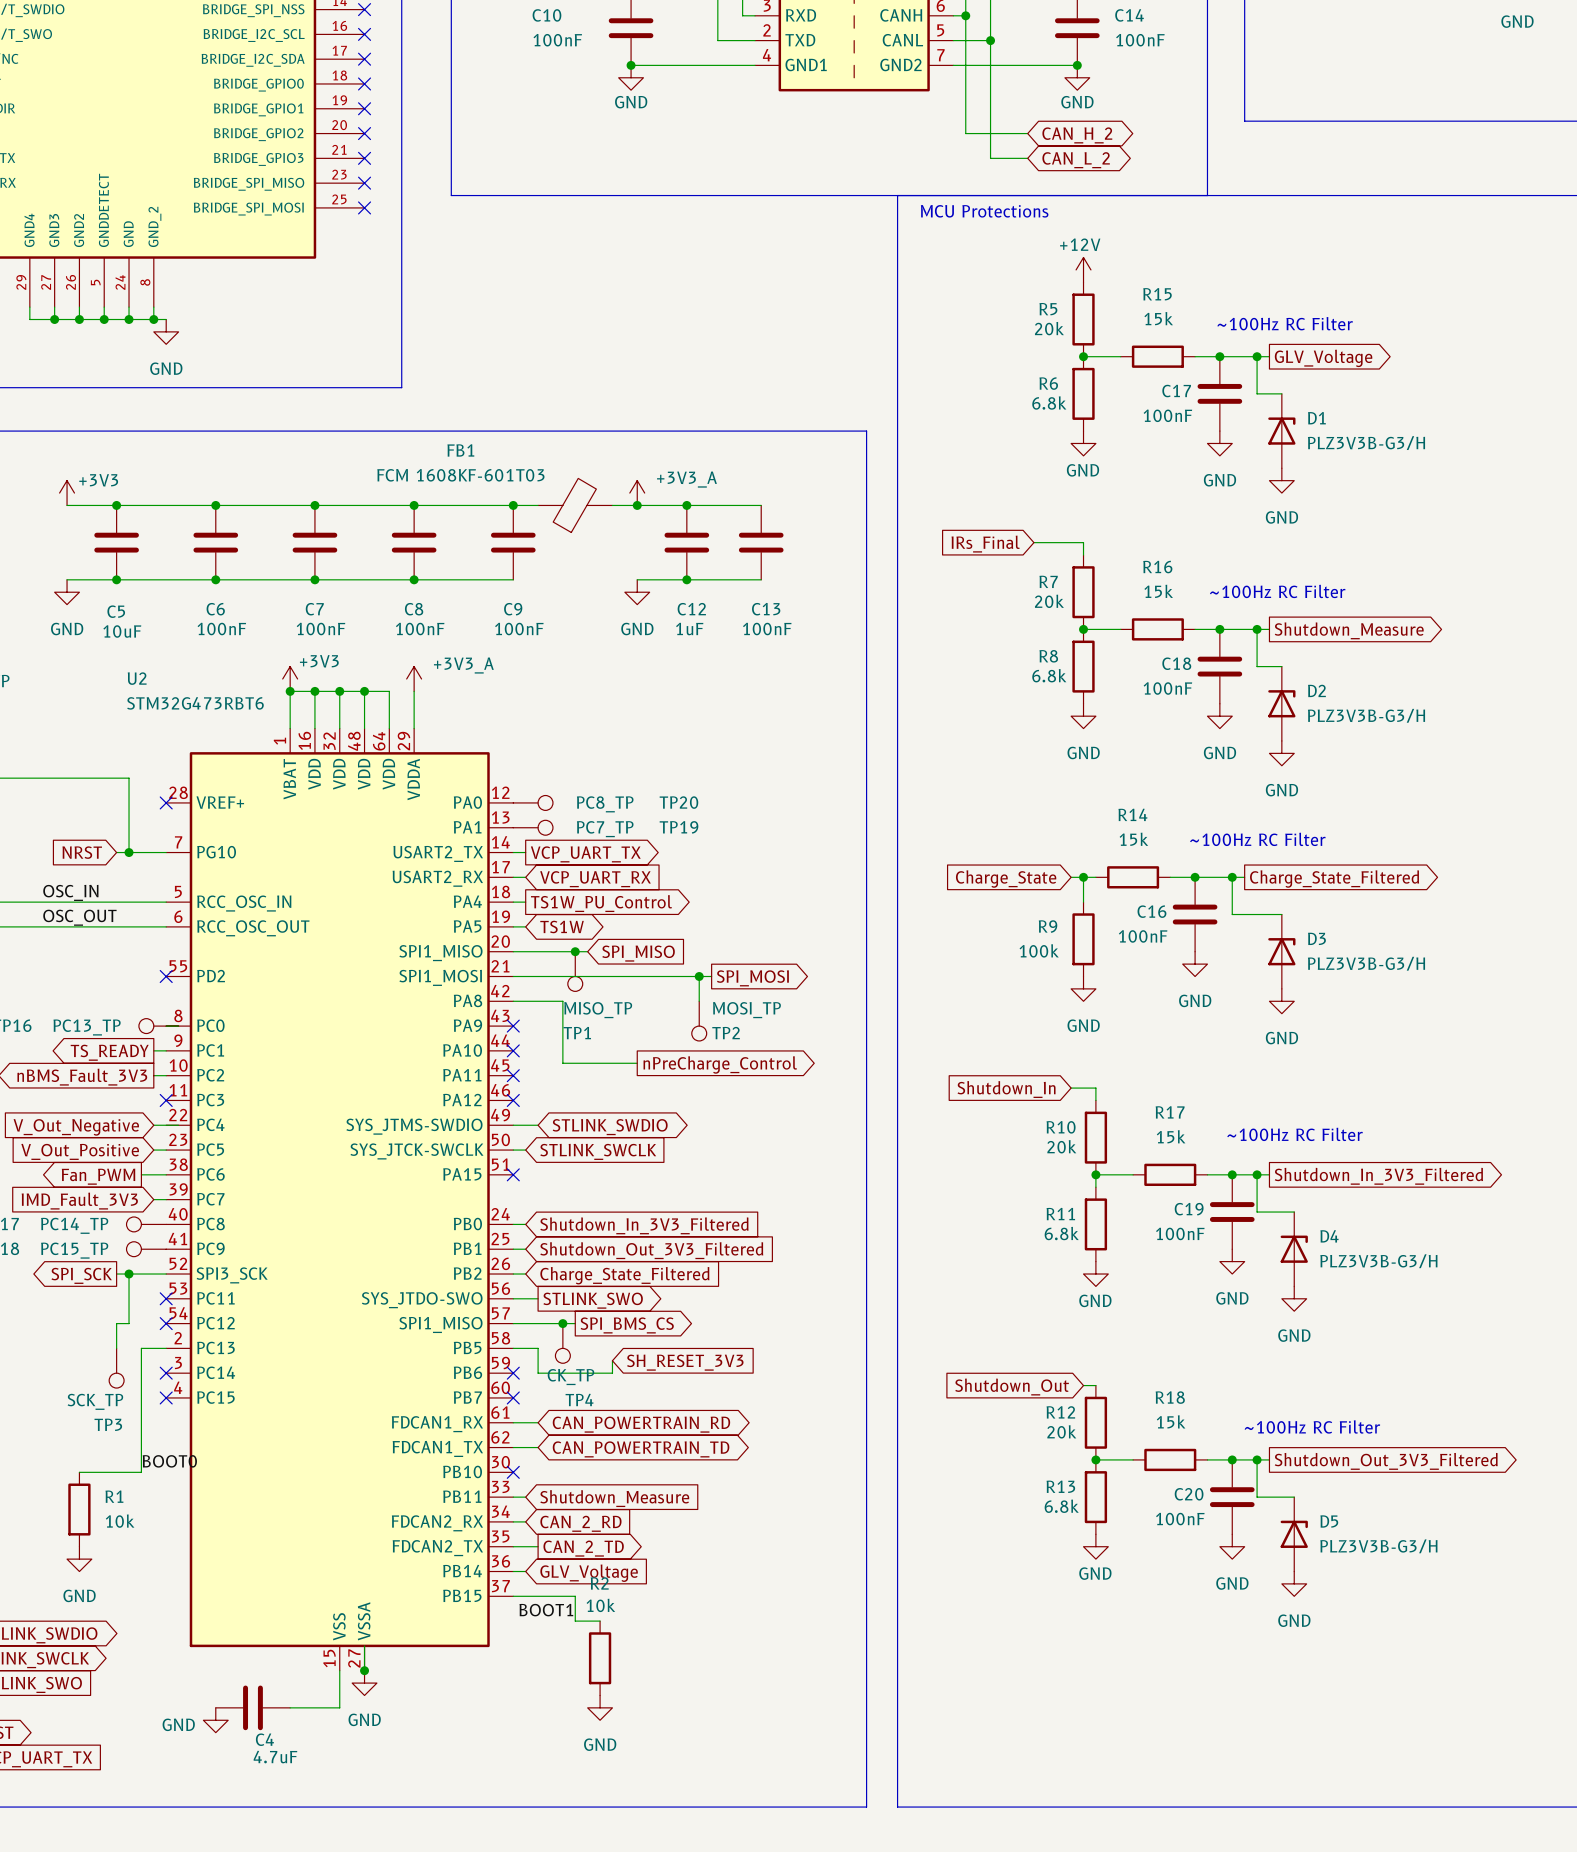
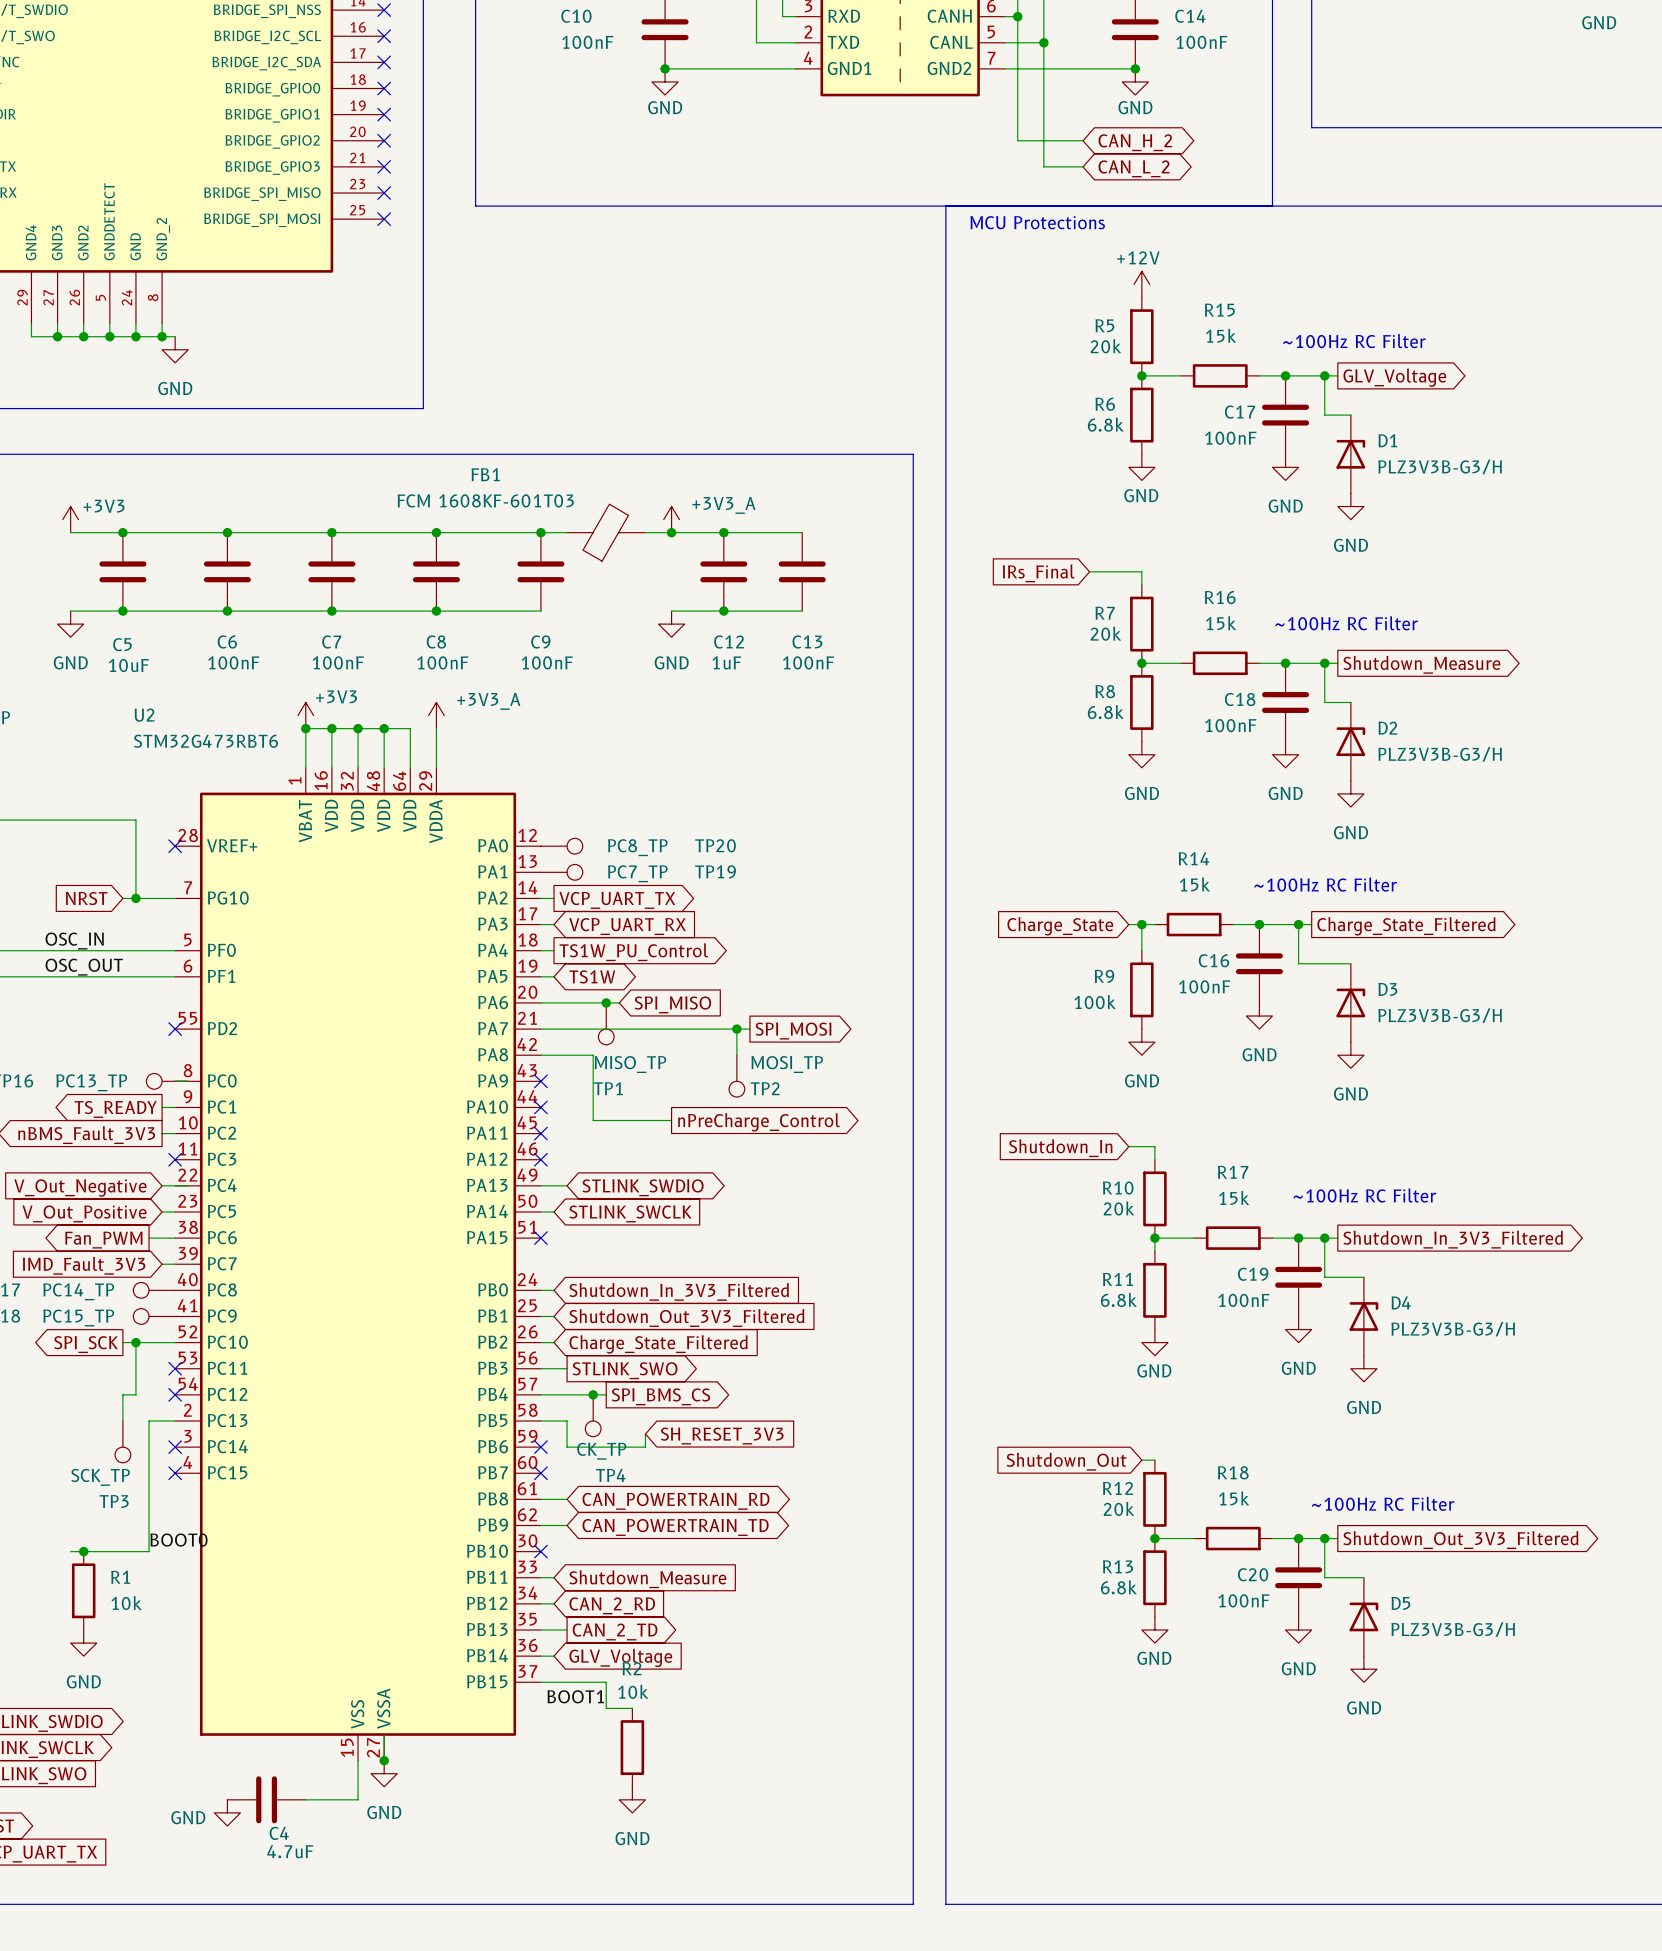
U2 symbol: [166, 728, 514, 1671] -> [175, 767, 541, 1761]
wire: none -> (70, 1551) (83, 1551)
junction: none -> (83, 1551)

